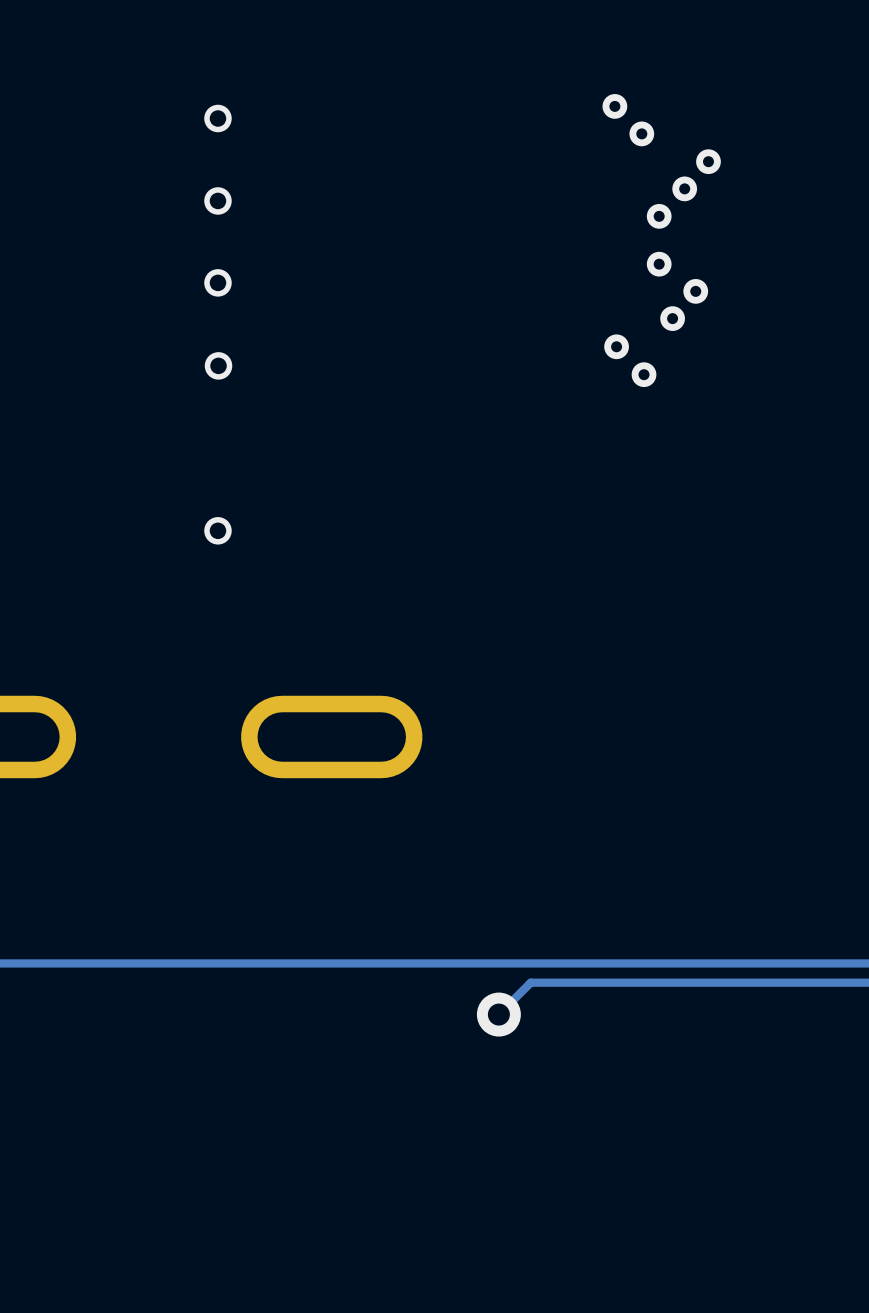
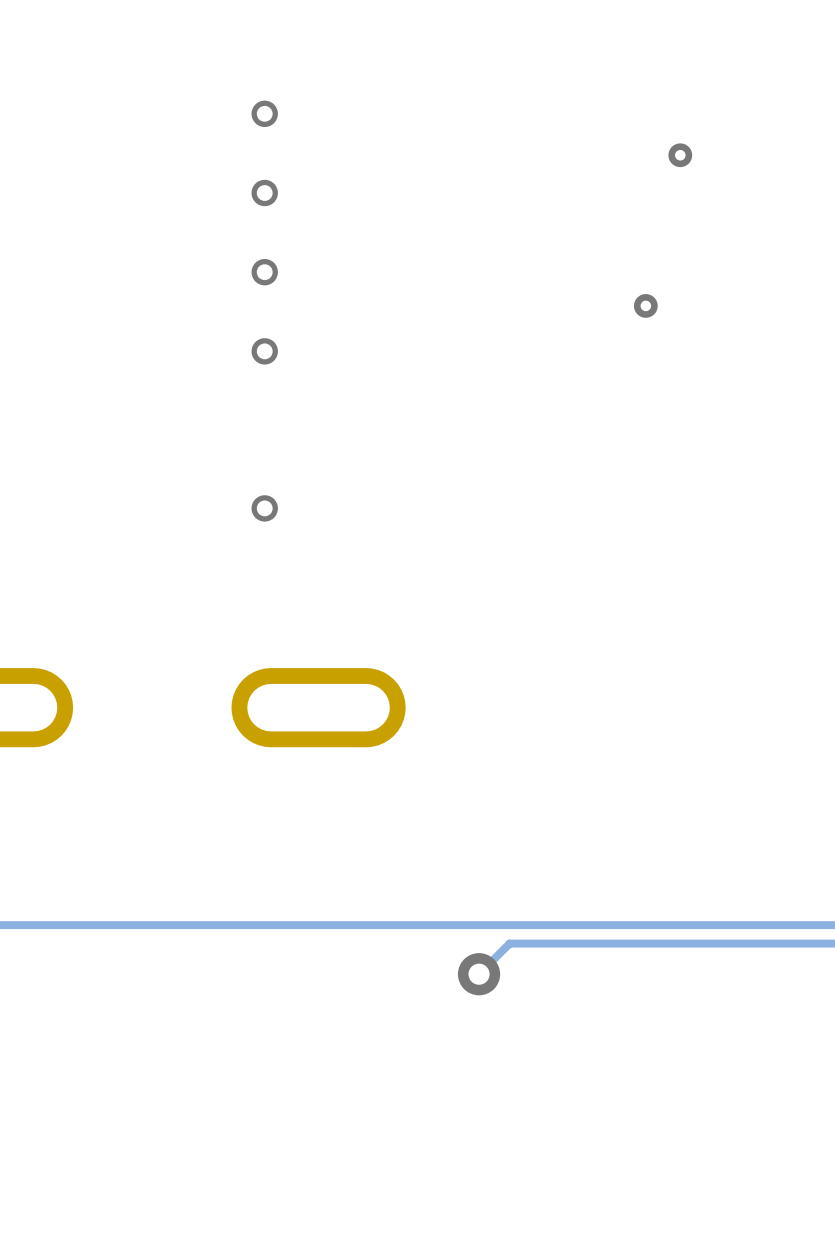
via: (614, 106) -> none
via: (217, 118) -> none
via: none -> (264, 113)
via: (641, 133) -> none
via: (684, 188) -> none
via: (217, 200) -> none
via: none -> (264, 193)
via: (659, 216) -> none
via: (659, 264) -> none
via: (217, 282) -> none
via: none -> (264, 272)
via: (695, 291) -> none
via: (616, 346) -> none
via: (218, 365) -> none
via: none -> (264, 351)
via: (644, 374) -> none
via position: (217, 530) -> (264, 508)

